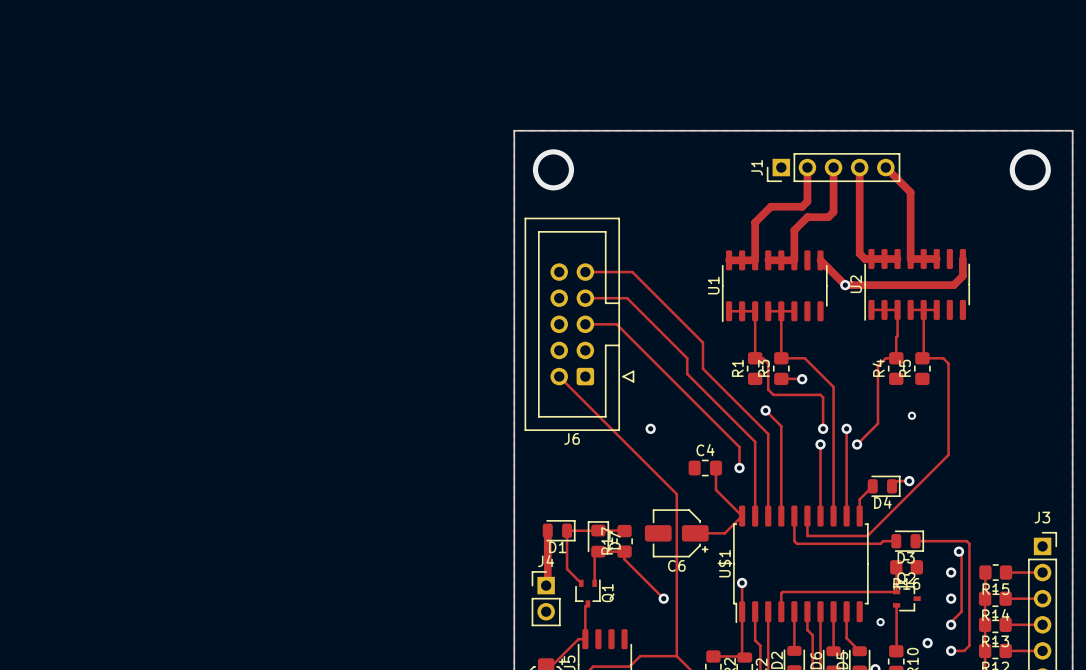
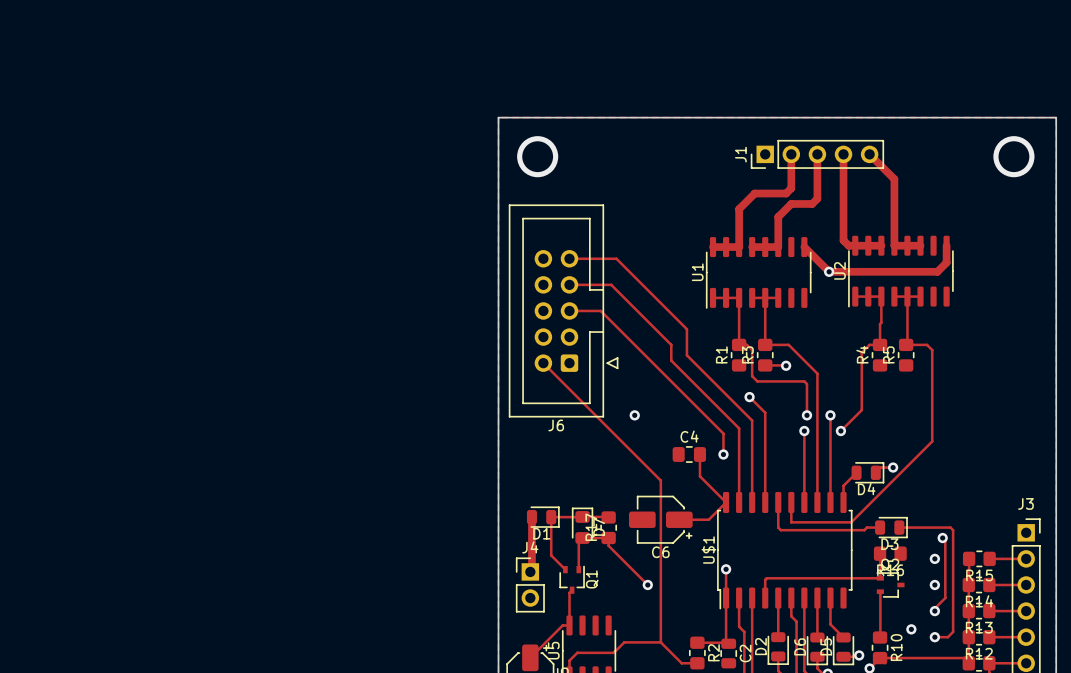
via: (911, 415) -> none
via: (880, 622) -> none

